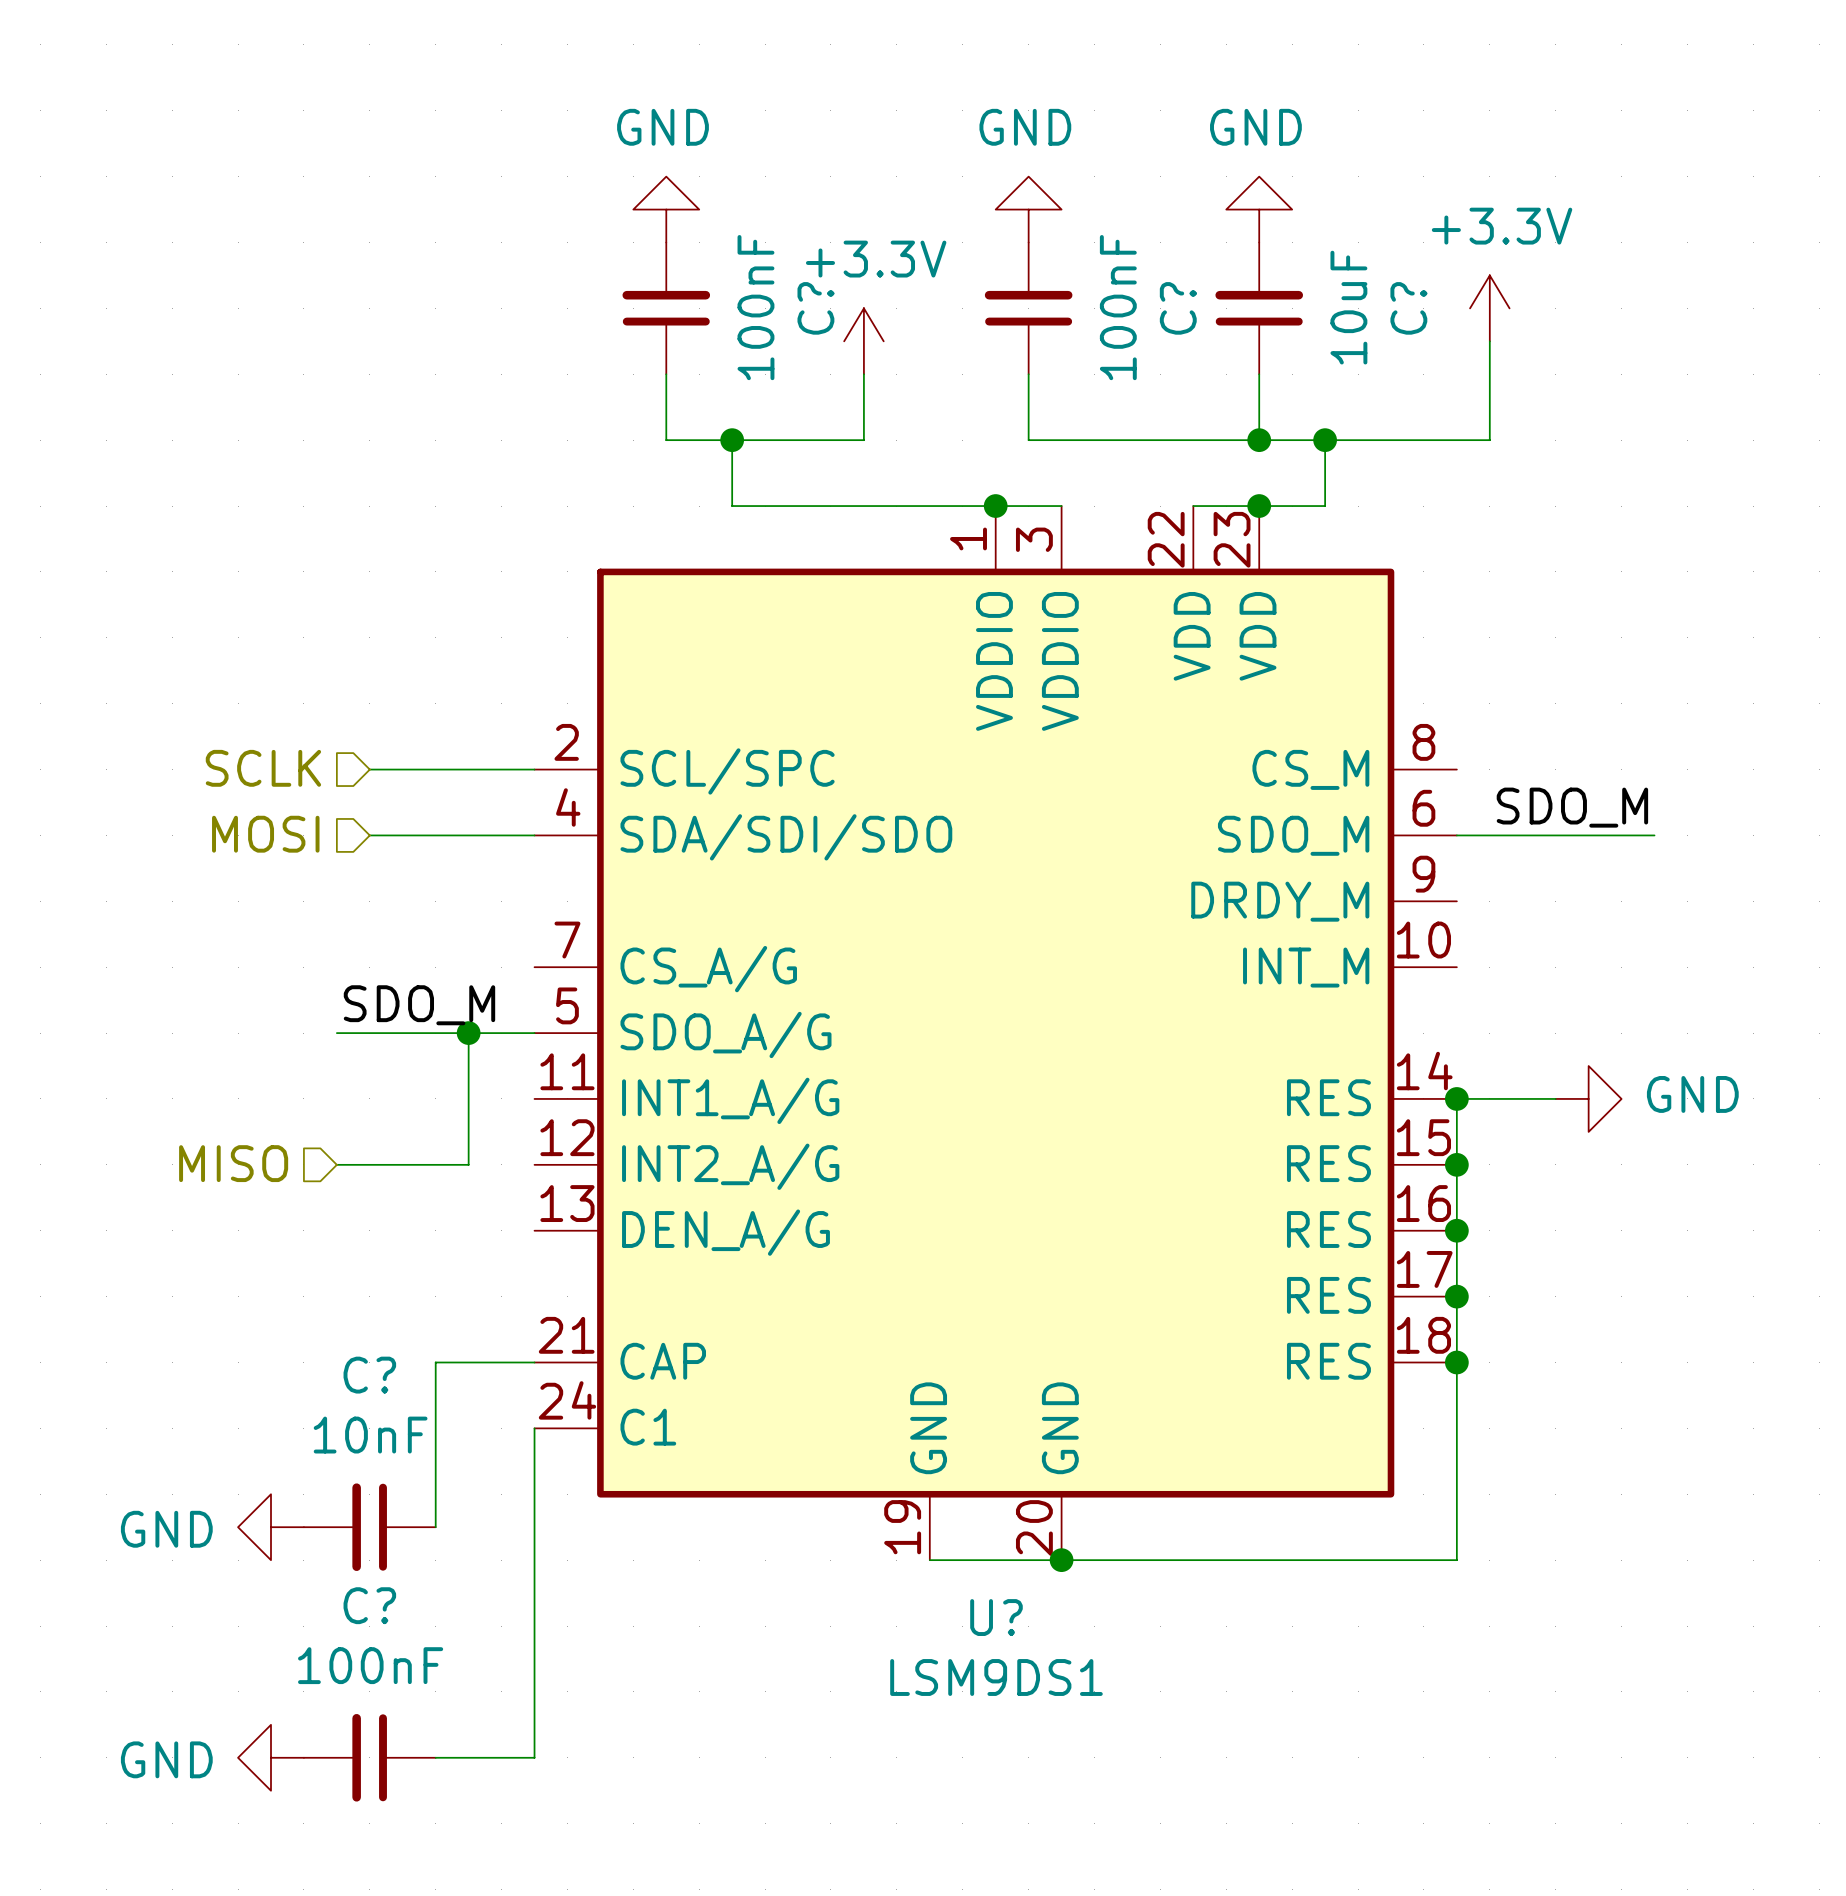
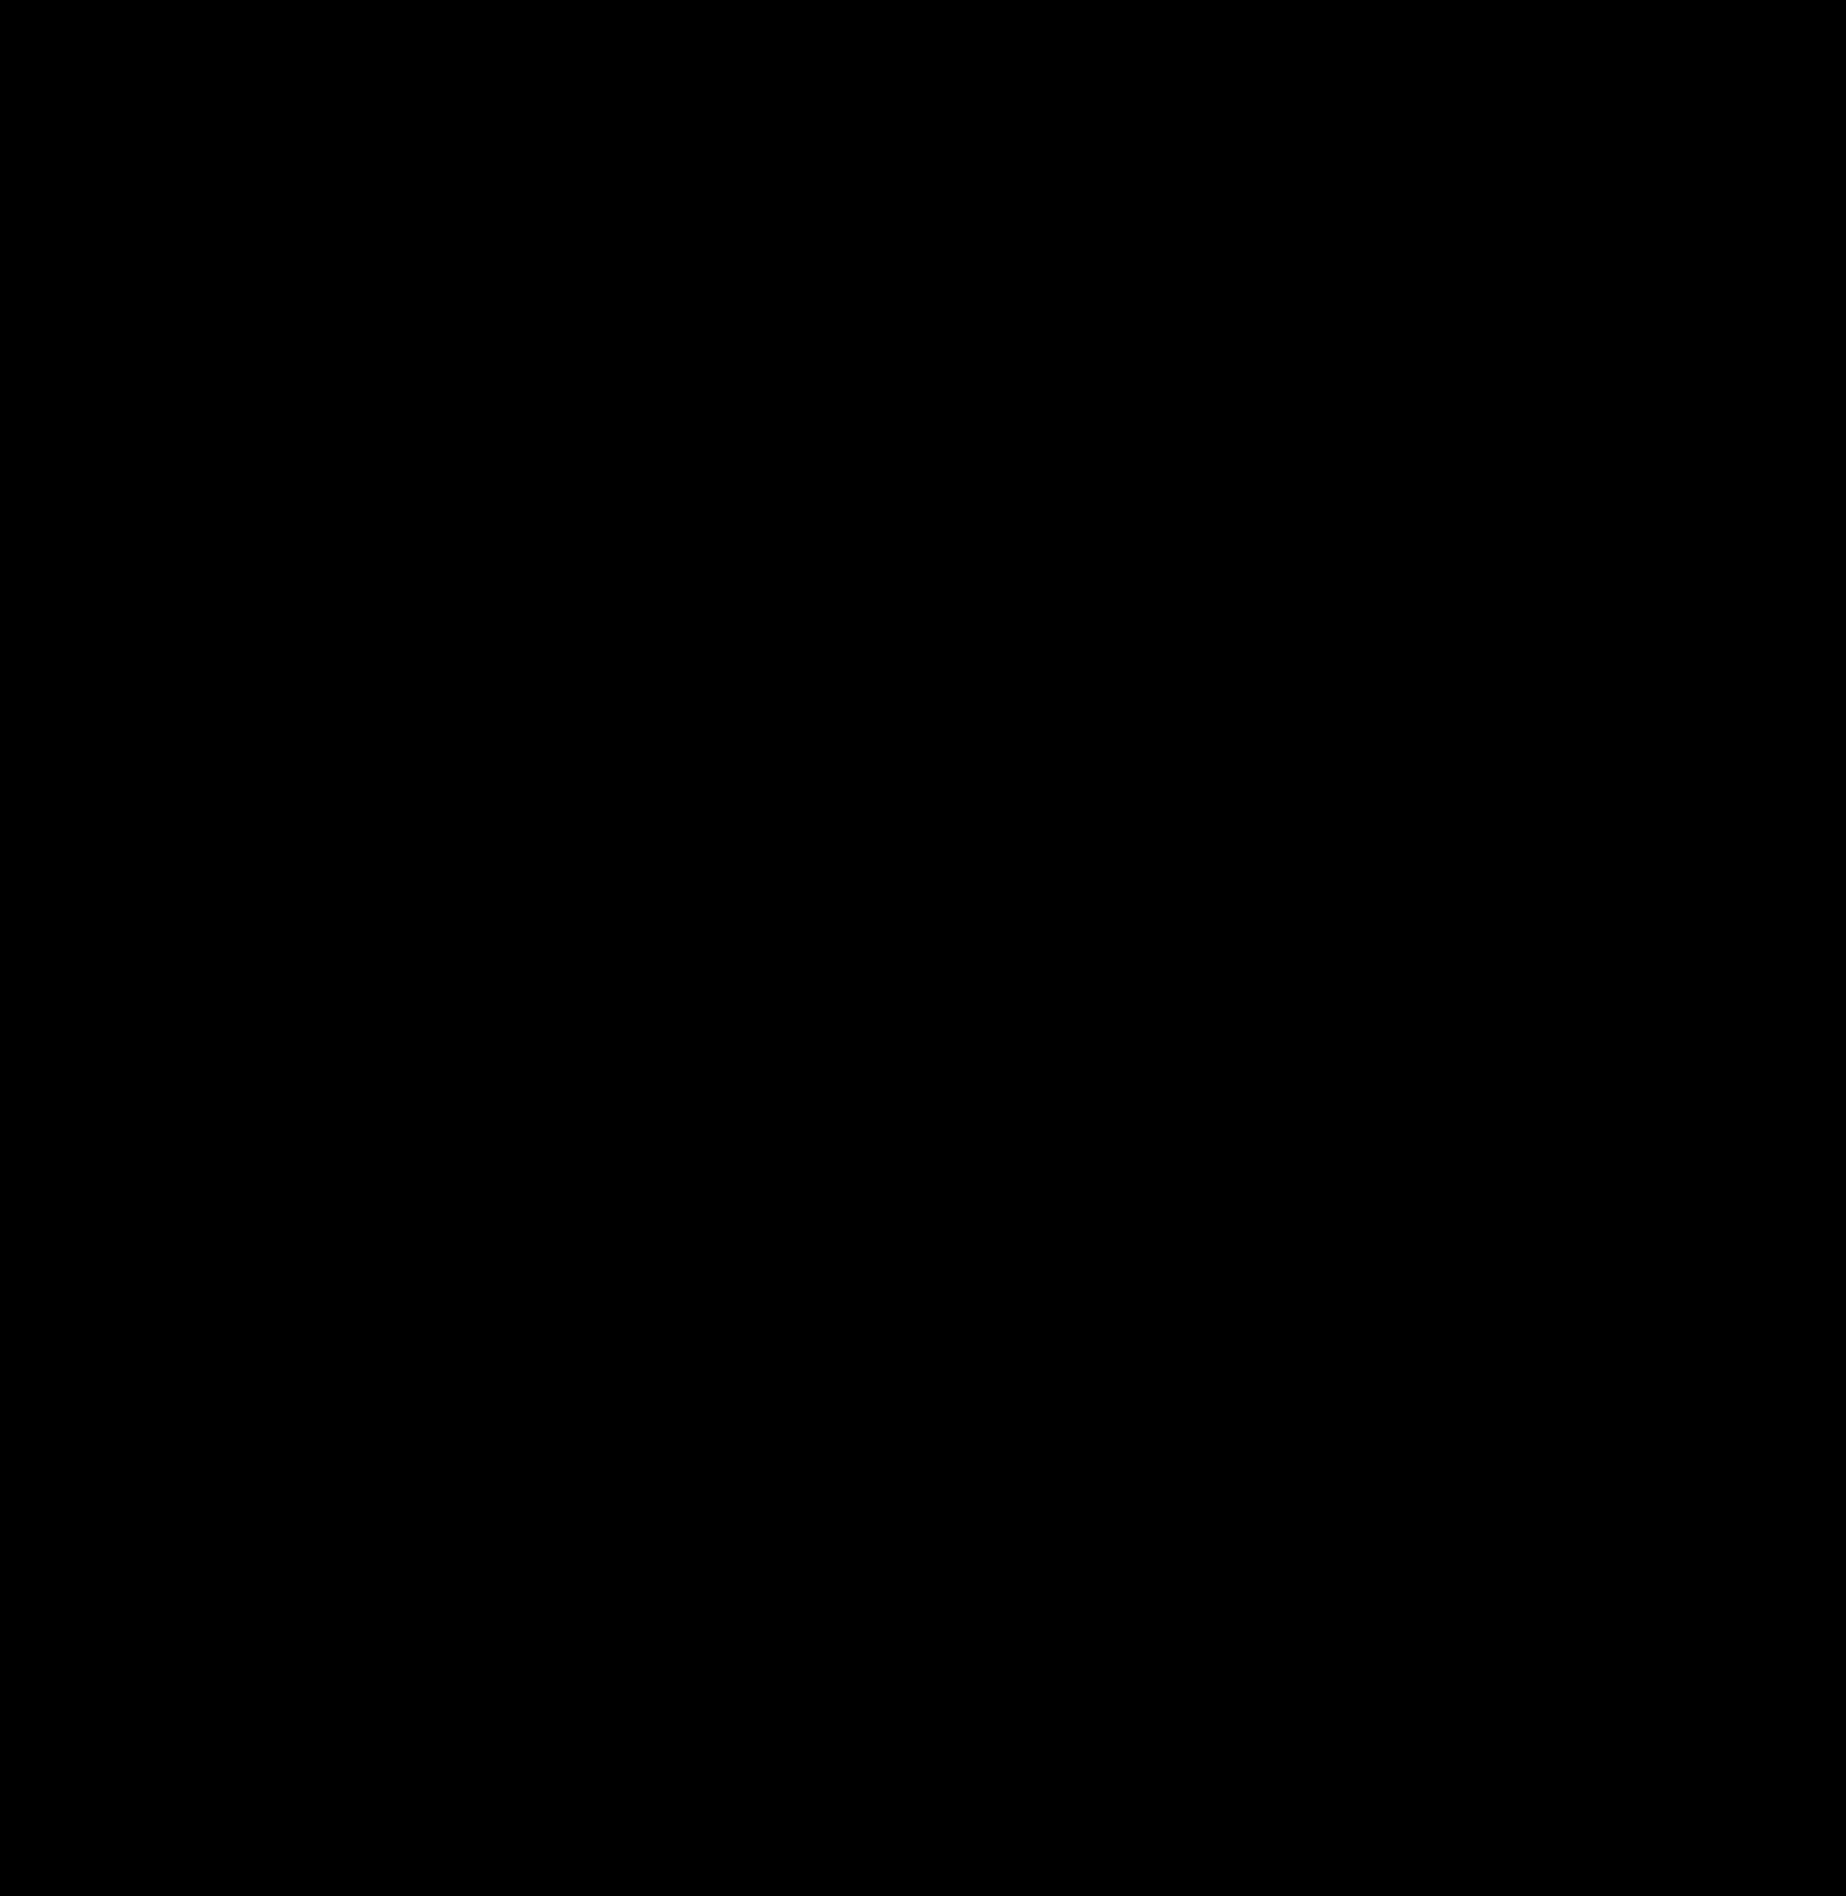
power symbol: GND (666, 209) -> none
power symbol: GND (1028, 209) -> none
power symbol: GND (1259, 209) -> none
C?: 100nF (666, 308) -> none
C?: 100nF (1028, 308) -> none
C?: 10uF (1259, 308) -> none
power symbol: +3.3V (1489, 308) -> none
power symbol: +3.3V (863, 341) -> none
wire: (1489, 341) (1489, 440) (1028, 440) (1028, 374) -> none
wire: (666, 374) (666, 440) (863, 440) (863, 374) -> none
wire: (1259, 374) (1259, 440) -> none
wire: (732, 440) (732, 506) (1061, 506) -> none
junction: (732, 440) -> none
junction: (1259, 440) -> none
wire: (1325, 440) (1325, 506) (1193, 506) -> none
junction: (1325, 440) -> none
junction: (995, 506) -> none
junction: (1259, 506) -> none
hierarchical label: SCLK (263, 768) -> none
wire: (369, 769) (534, 769) -> none
label: SDO_M (1572, 807) -> none
hierarchical label: MOSI (265, 834) -> none
wire: (369, 835) (534, 835) -> none
wire: (1456, 835) (1654, 835) -> none
label: SDO_M (419, 1005) -> none
wire: (336, 1033) (534, 1033) -> none
wire: (468, 1033) (468, 1164) (336, 1164) -> none
junction: (468, 1033) -> none
U?: LSM9DS1 (995, 1033) -> none
junction: (1456, 1098) -> none
wire: (1555, 1098) (1456, 1098) (1456, 1560) (929, 1560) -> none
power symbol: GND (1588, 1098) -> none
hierarchical label: MISO (233, 1163) -> none
junction: (1456, 1164) -> none
junction: (1456, 1230) -> none
junction: (1456, 1296) -> none
wire: (534, 1362) (435, 1362) (435, 1527) -> none
junction: (1456, 1362) -> none
wire: (534, 1428) (534, 1757) (435, 1757) -> none
power symbol: GND (271, 1527) -> none
C?: 10nF (369, 1527) -> none
junction: (1061, 1560) -> none
power symbol: GND (271, 1757) -> none
C?: 100nF (369, 1757) -> none

